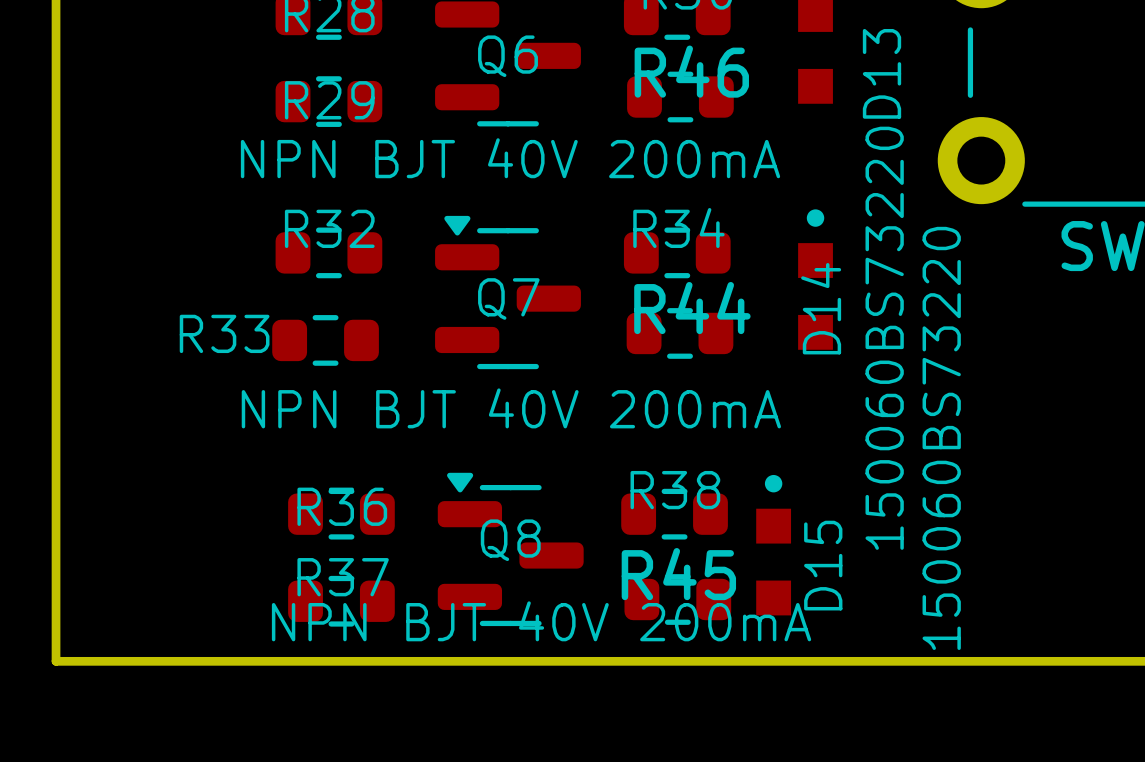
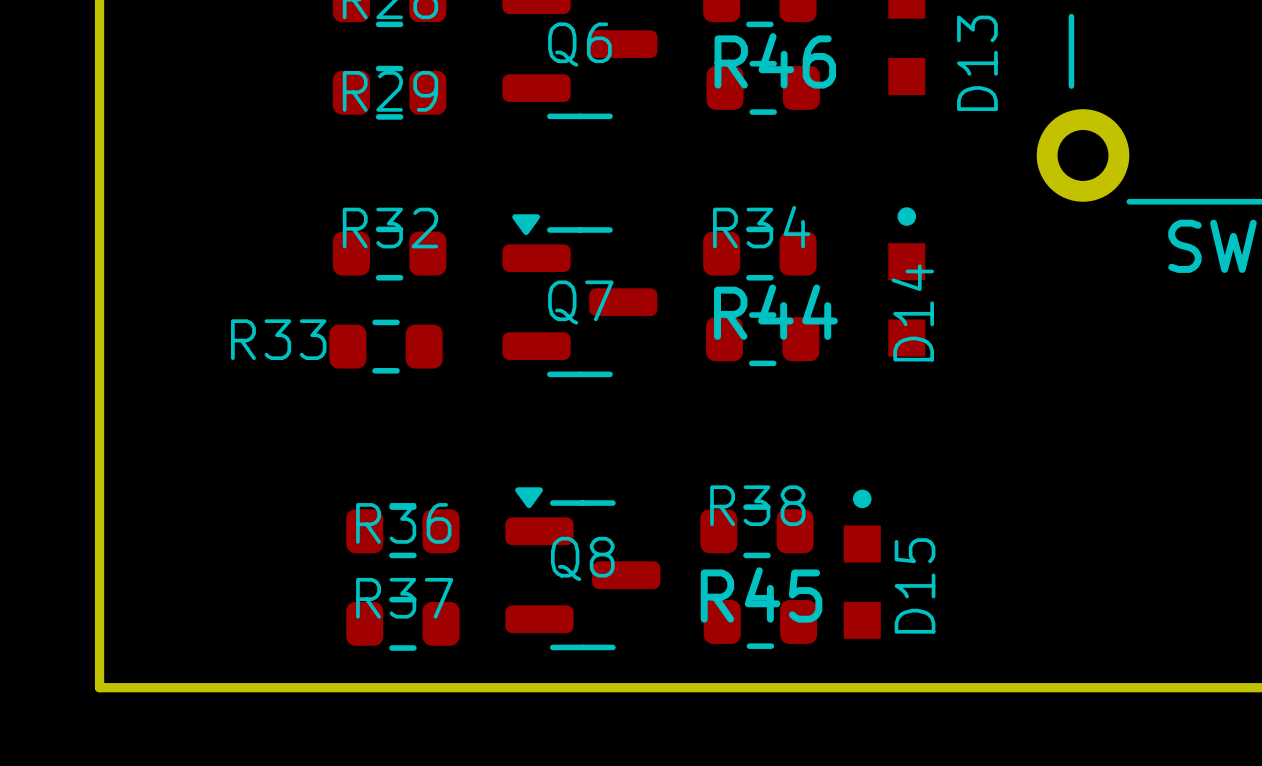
Q6 value: NPN BJT 40V 200mA (510, 158) -> none
D14 value: 150060BS73220 (884, 338) -> none
Q7 value: NPN BJT 40V 200mA (511, 408) -> none
D15 value: 150060BS73220 (941, 438) -> none
Q8 value: NPN BJT 40V 200mA (541, 621) -> none

